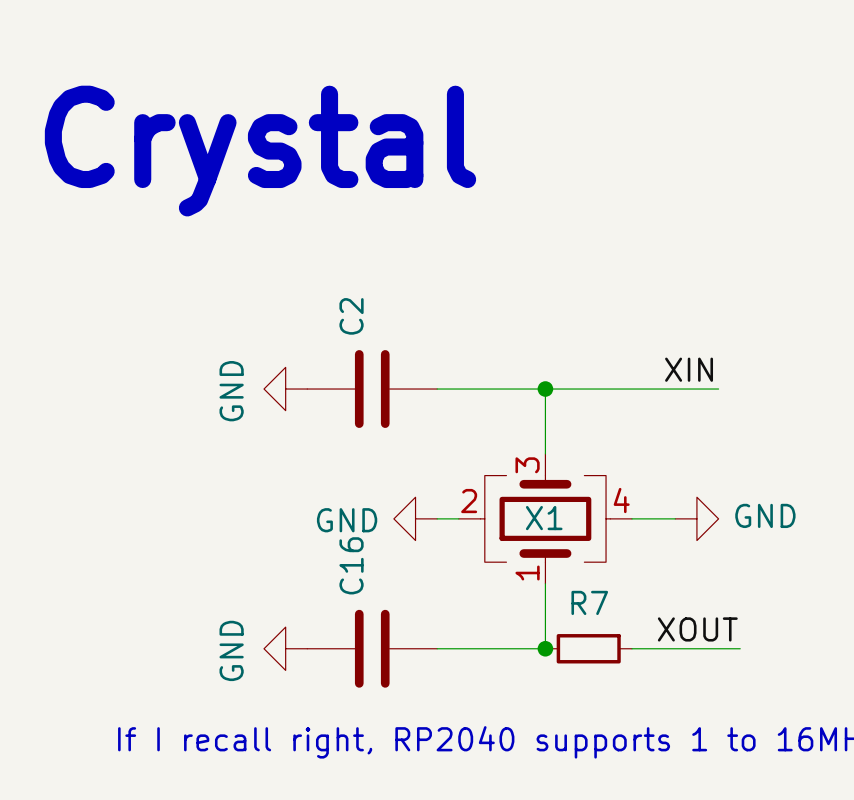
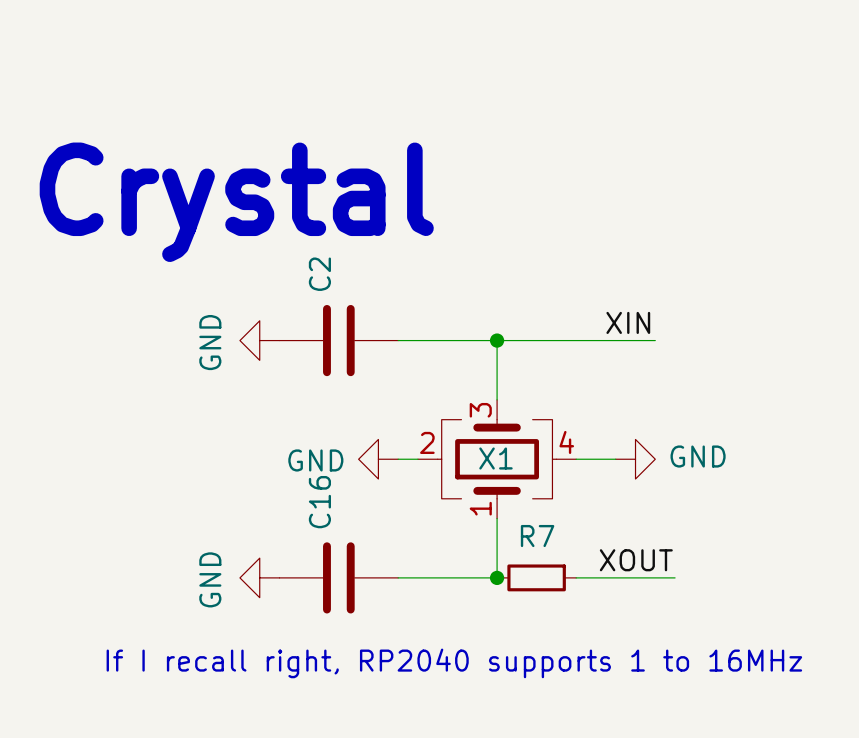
text position: Crystal (260, 151) -> Crystal (236, 202)

